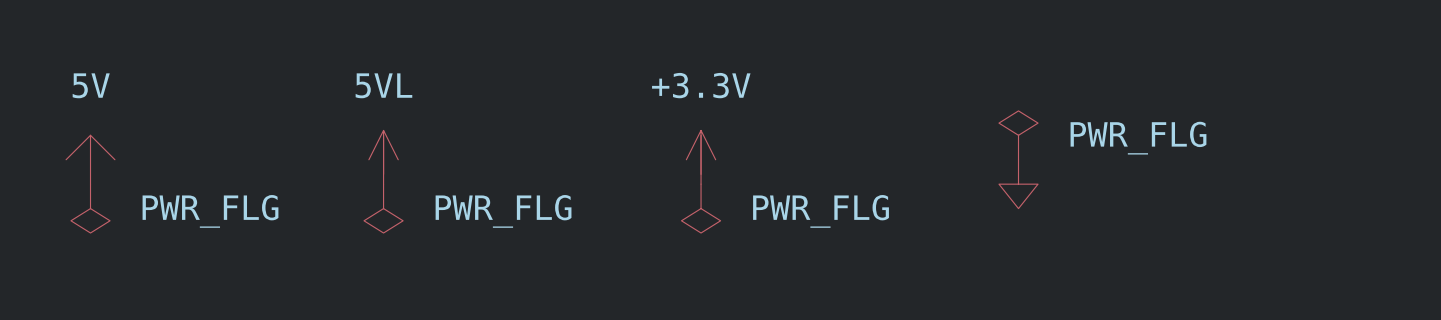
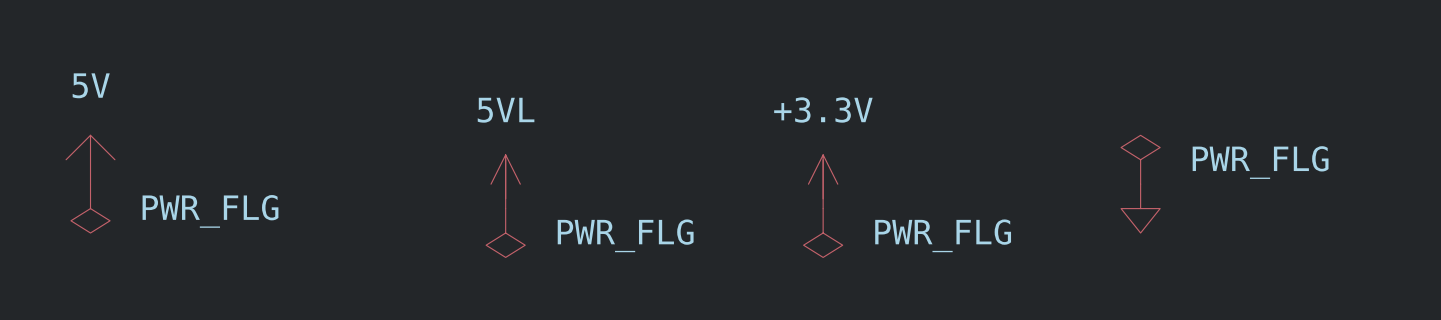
power symbol: PWR_FLG (1018, 135) -> none
power symbol position: 5VL (383, 157) -> 5VL (505, 181)
power symbol position: +3.3V (701, 157) -> +3.3V (823, 181)
power symbol: none -> PWR_FLG (1140, 159)
power symbol position: (1018, 184) -> (1140, 208)
power symbol: PWR_FLG (383, 208) -> none
power symbol: PWR_FLG (701, 208) -> none
power symbol: none -> PWR_FLG (505, 233)
power symbol: none -> PWR_FLG (823, 233)

